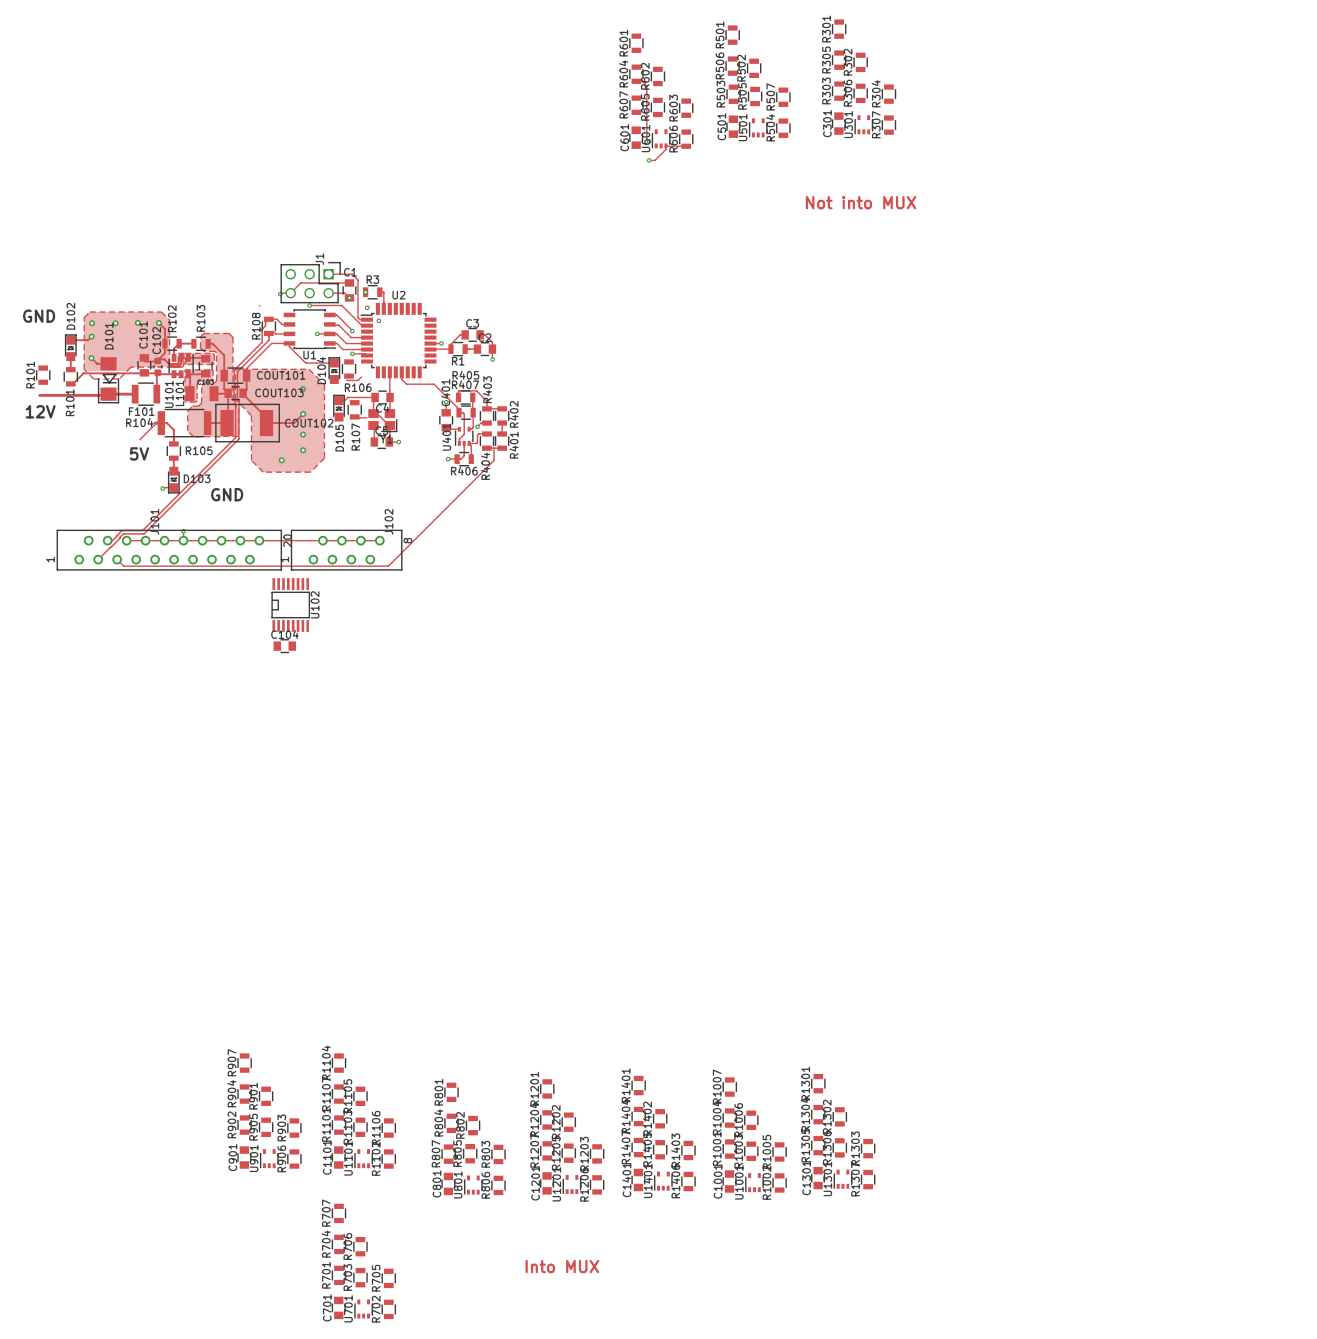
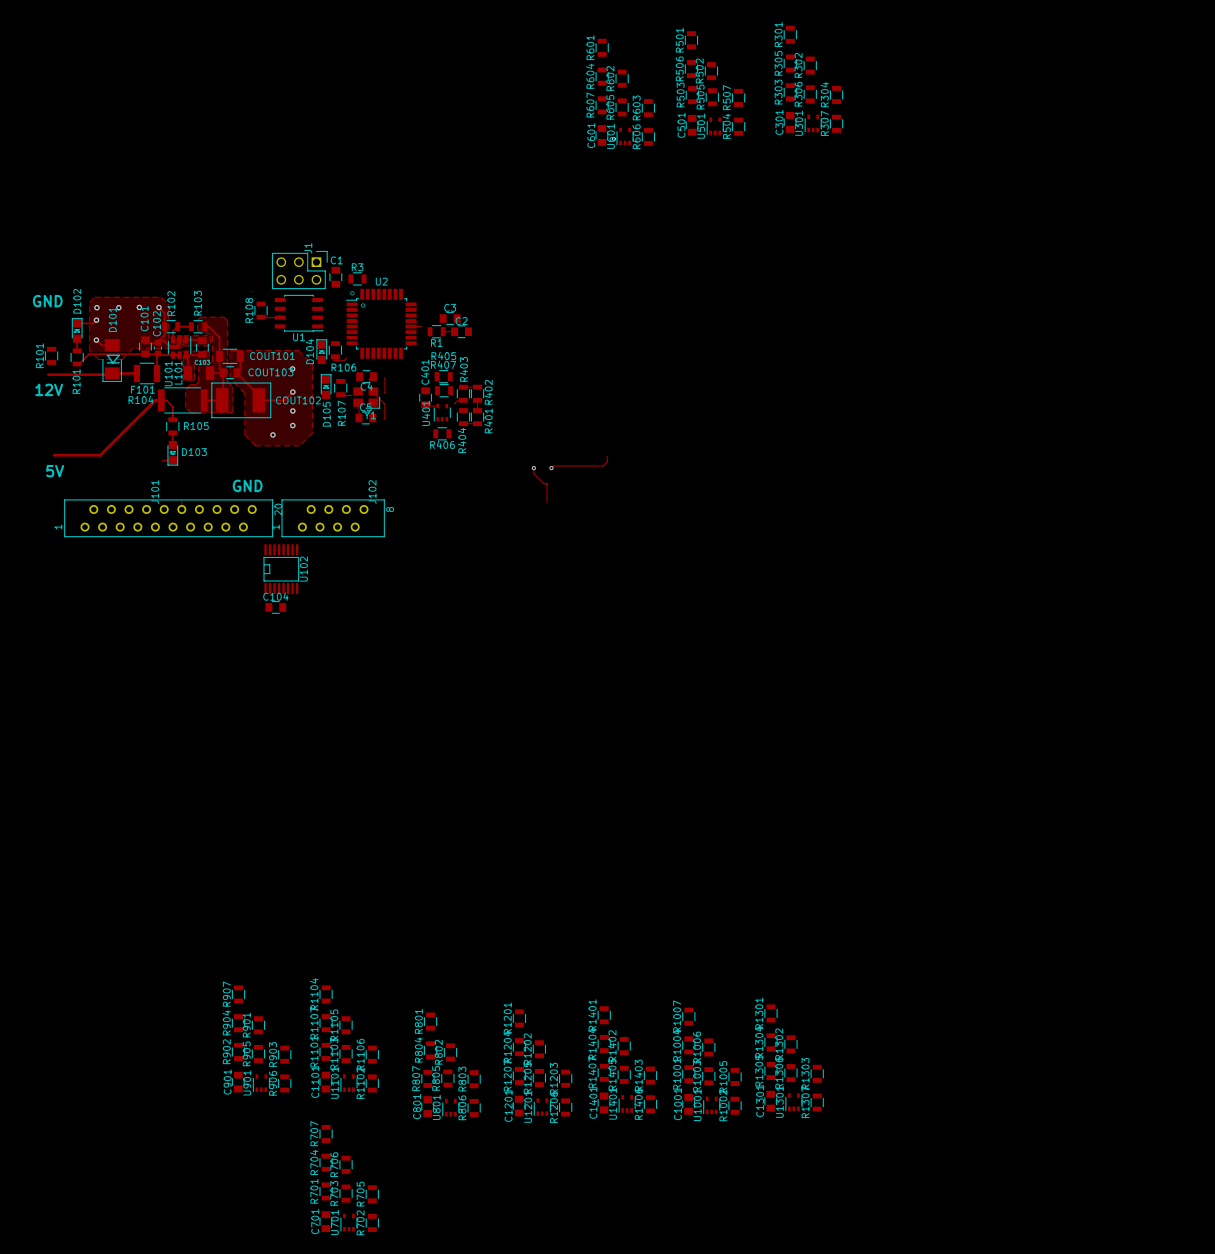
track: (636, 81) (642, 81) (646, 85) (646, 139) (649, 141) -> none
track: (686, 146) (665, 145) (665, 149) (654, 160) (649, 160) -> none
via: (649, 160) -> none
text: Not into MUX (861, 202) -> none
track: (328, 274) (352, 274) (358, 280) (358, 317) (367, 319) -> none
track: (349, 282) (300, 282) (290, 293) (280, 294) -> none
via: (365, 292) -> none
track: (379, 292) (383, 292) (383, 308) -> none
track: (328, 293) (344, 293) (349, 297) -> none
via: (280, 294) -> none
via: (349, 297) -> none
track: (309, 305) (341, 305) (361, 325) (367, 325) -> none
via: (309, 305) -> none
track: (329, 314) (336, 314) (352, 331) -> none
track: (289, 324) (282, 324) (276, 319) (268, 319) (262, 329) (262, 342) (234, 370) (235, 437) (142, 530) (122, 530) (112, 540) (107, 540) -> none
track: (329, 324) (338, 325) (351, 337) (367, 337) -> none
via: (352, 331) -> none
track: (268, 333) (268, 340) (237, 371) (238, 439) (144, 533) (123, 533) (98, 559) -> none
track: (317, 333) (336, 333) (346, 343) (367, 343) -> none
via: (317, 333) -> none
track: (465, 334) (460, 334) (450, 344) (450, 349) (430, 349) -> none
track: (480, 334) (484, 334) (492, 342) (492, 359) -> none
track: (329, 343) (336, 343) (342, 349) (367, 349) -> none
via: (441, 343) -> none
track: (352, 353) (367, 355) -> none
via: (352, 353) -> none
via: (492, 359) -> none
track: (334, 363) (305, 363) (289, 346) (289, 343) (271, 343) (246, 368) (246, 375) -> none
track: (389, 372) (390, 413) -> none
track: (401, 372) (401, 379) (406, 384) (434, 384) (459, 409) (459, 412) (464, 414) (464, 434) (459, 439) (459, 443) -> none
track: (458, 397) (459, 390) (476, 390) (486, 401) (486, 408) -> none
track: (472, 397) (473, 427) (469, 429) -> none
track: none -> (371, 377) (369, 392) (373, 392) (384, 403) (384, 418)
track: none -> (384, 377) (384, 392)
track: (339, 400) (344, 400) (347, 397) (375, 397) (373, 413) (377, 413) (389, 425) (389, 442) (398, 442) -> none
track: (446, 402) (446, 412) -> none
via: (446, 402) -> none
track: none -> (155, 400) (100, 455) (53, 455)
via: (477, 426) -> none
track: (486, 434) (478, 434) (477, 443) (469, 443) (471, 445) (471, 459) -> none
via: (398, 442) -> none
track: (464, 443) (464, 455) (460, 459) (448, 459) -> none
track: (494, 448) (494, 460) (388, 566) (123, 566) (117, 559) -> none
text position: 5V (139, 453) -> 5V (55, 471)
via: (448, 459) -> none
track: none -> (607, 456) (607, 461) (603, 466) (553, 466) (551, 468)
via: (162, 488) -> none
text position: GND (227, 494) -> GND (247, 485)
track: none -> (533, 468) (533, 473) (544, 483) (547, 483) (546, 502)
via: none -> (533, 468)
via: none -> (551, 468)
via: (183, 531) -> none
track: (122, 540) (379, 540) -> none
text: Into MUX (562, 1266) -> none

